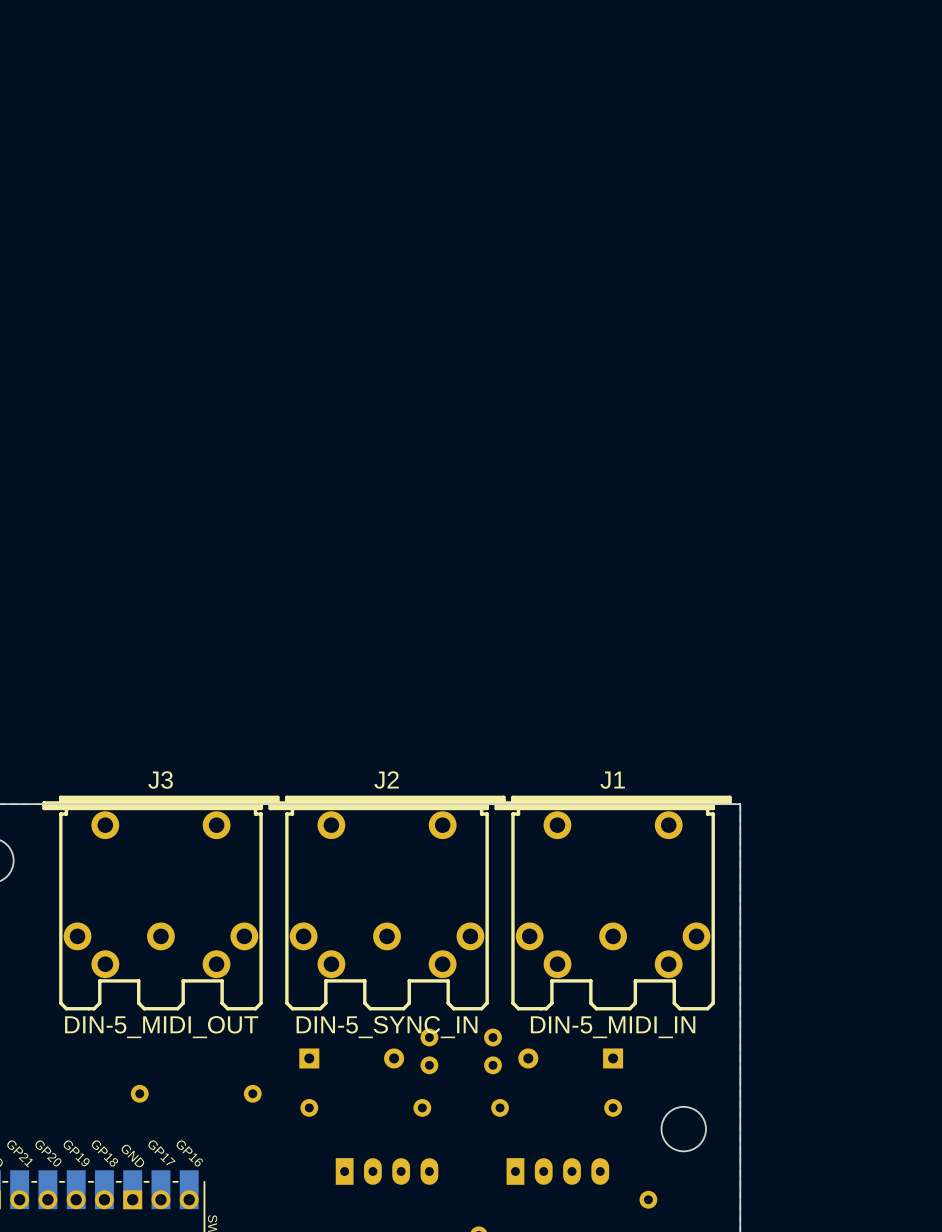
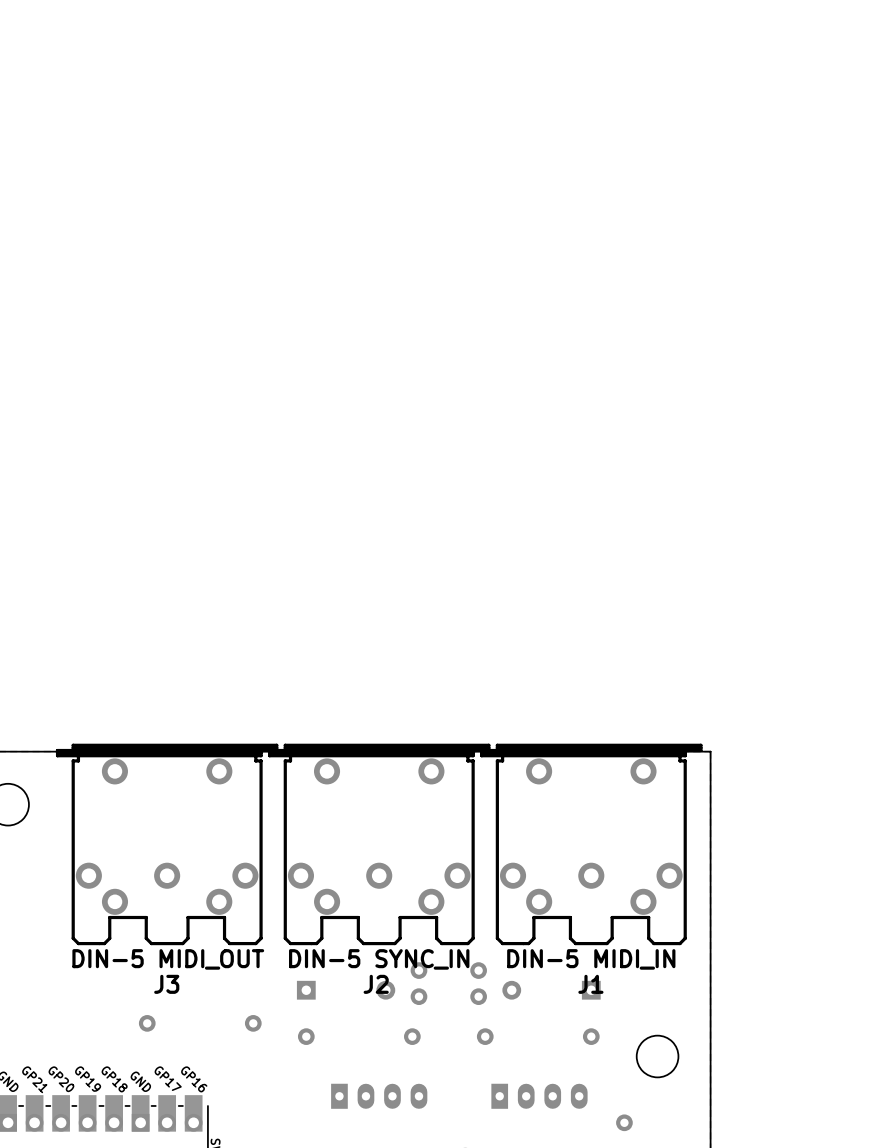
J3 name position: J3 (160, 780) -> J3 (166, 984)
J2 name position: J2 (386, 780) -> J2 (376, 984)
J1 name position: J1 (612, 780) -> J1 (590, 984)
J3 value: DIN-5_MIDI_OUT (161, 1027) -> DIN-5 MIDI_OUT (168, 959)
J2 value: DIN-5_SYNC_IN (387, 1027) -> DIN-5 SYNC_IN (379, 959)
J1 value: DIN-5_MIDI_IN (613, 1027) -> DIN-5 MIDI_IN (591, 959)

